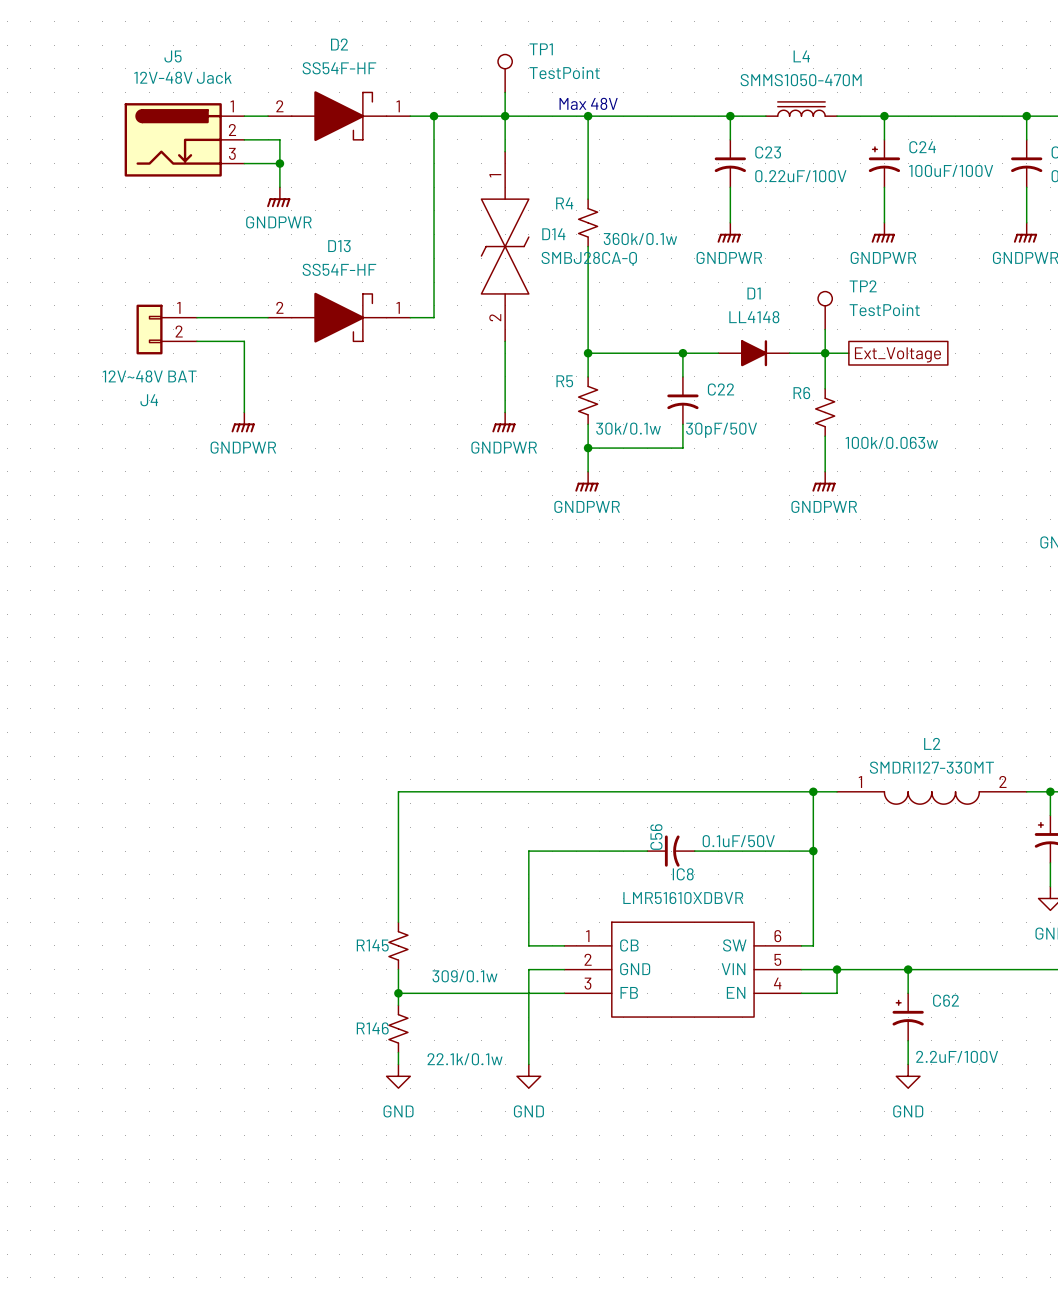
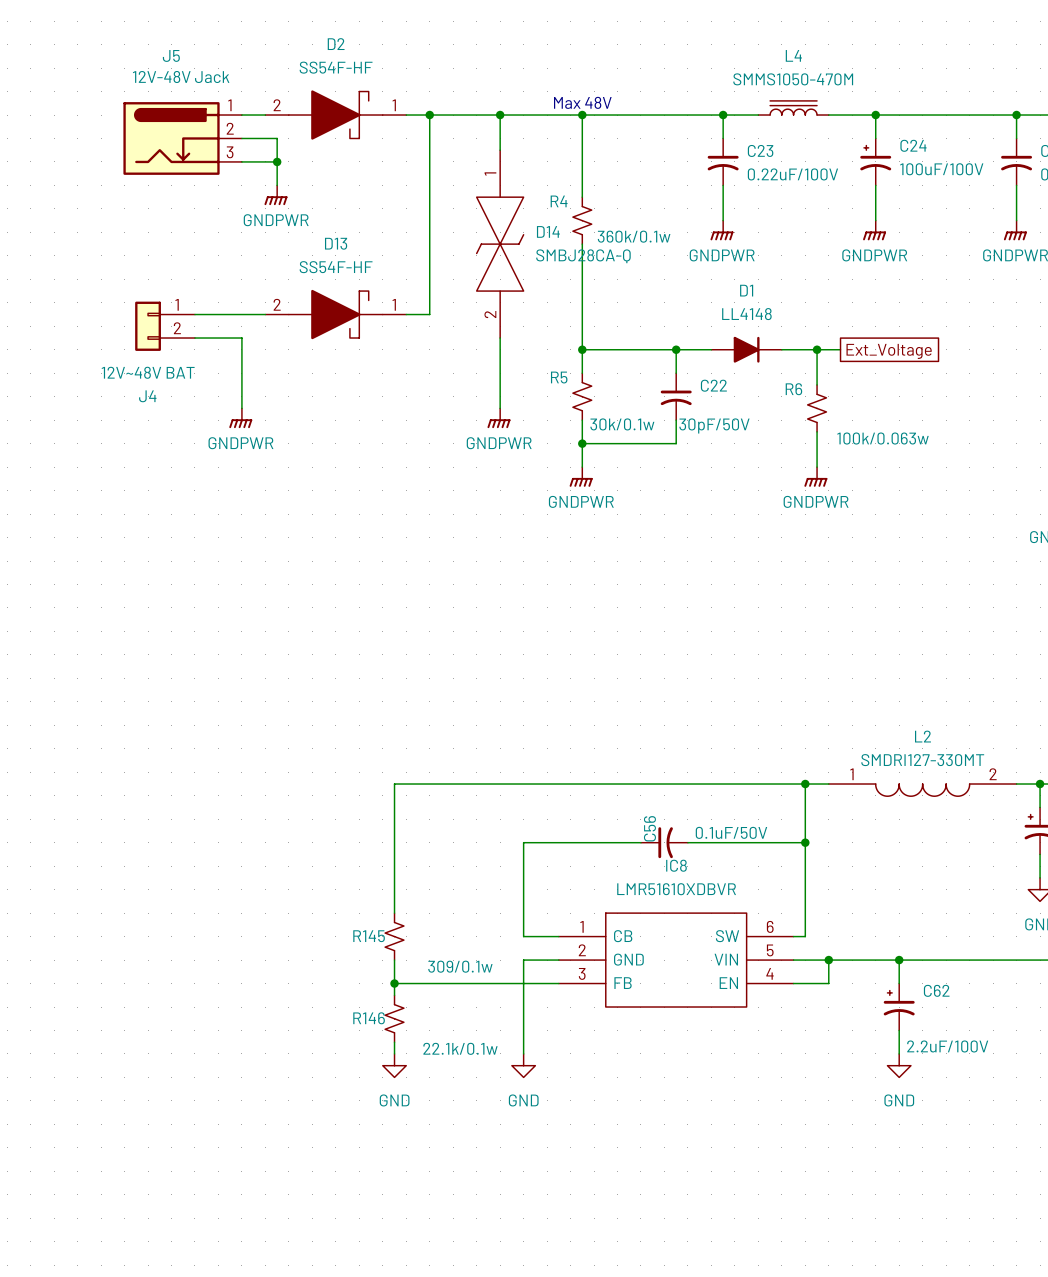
TP1: TestPoint (505, 73) -> none
wire: (505, 92) (505, 116) -> none
TP2: TestPoint (825, 310) -> none
wire: (825, 329) (825, 353) -> none

